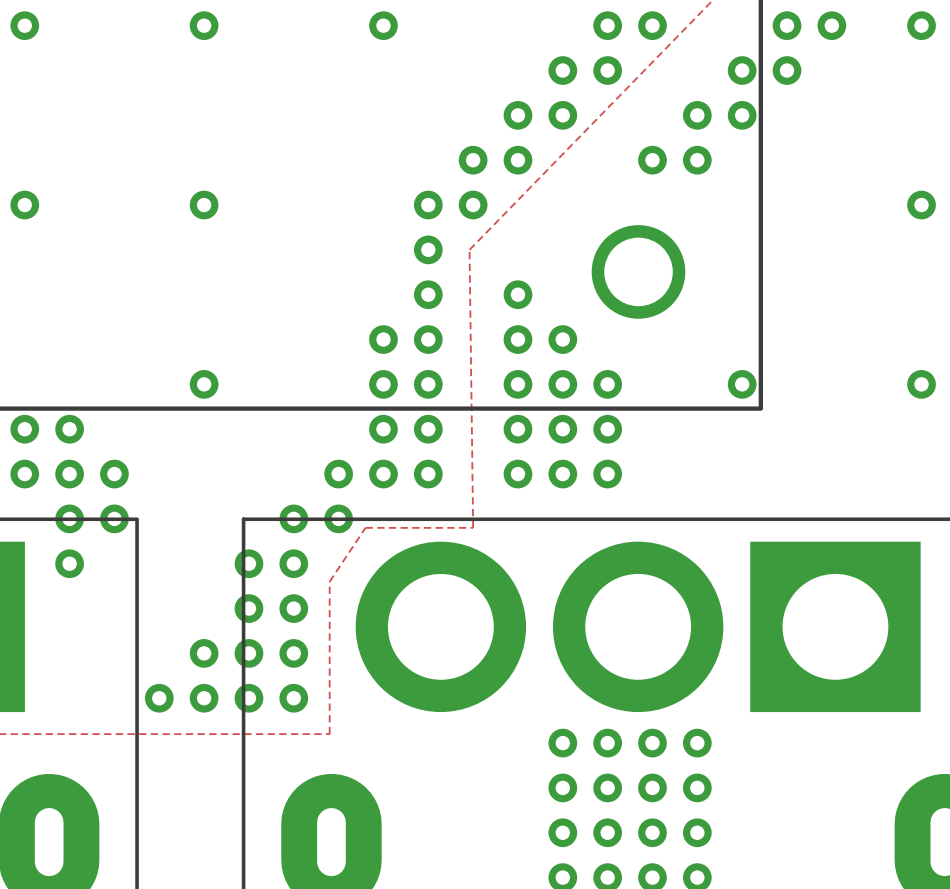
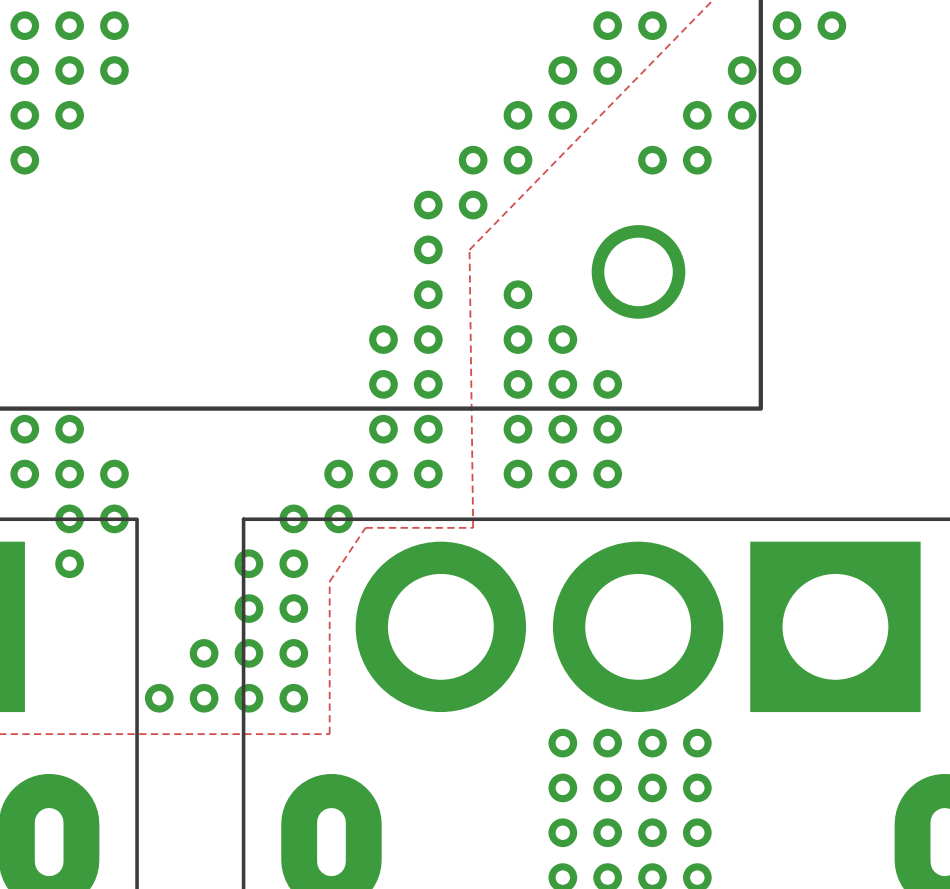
via: none -> (69, 25)
via: none -> (114, 25)
via: (204, 25) -> none
via: (383, 25) -> none
via: (921, 25) -> none
via: none -> (24, 70)
via: none -> (69, 70)
via: none -> (114, 70)
via: none -> (24, 115)
via: none -> (69, 115)
via: none -> (24, 160)
via: (24, 205) -> none
via: (204, 205) -> none
via: (921, 205) -> none
via: (204, 384) -> none
via: (742, 384) -> none
via: (921, 384) -> none

